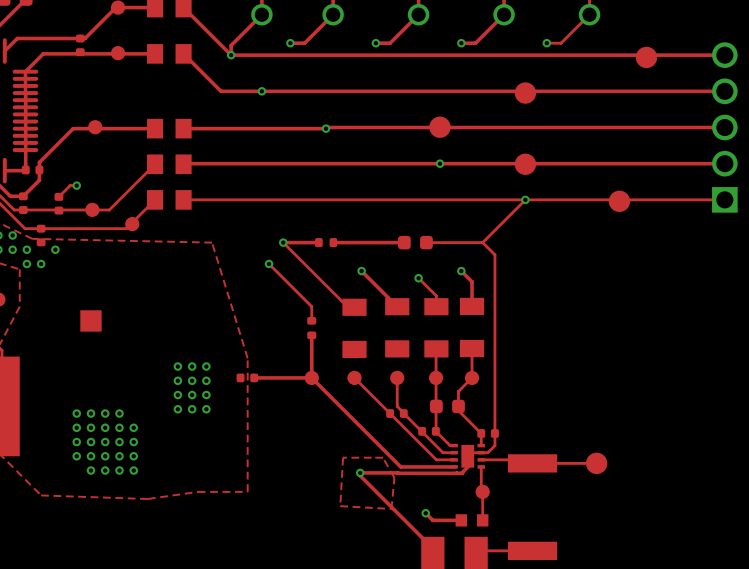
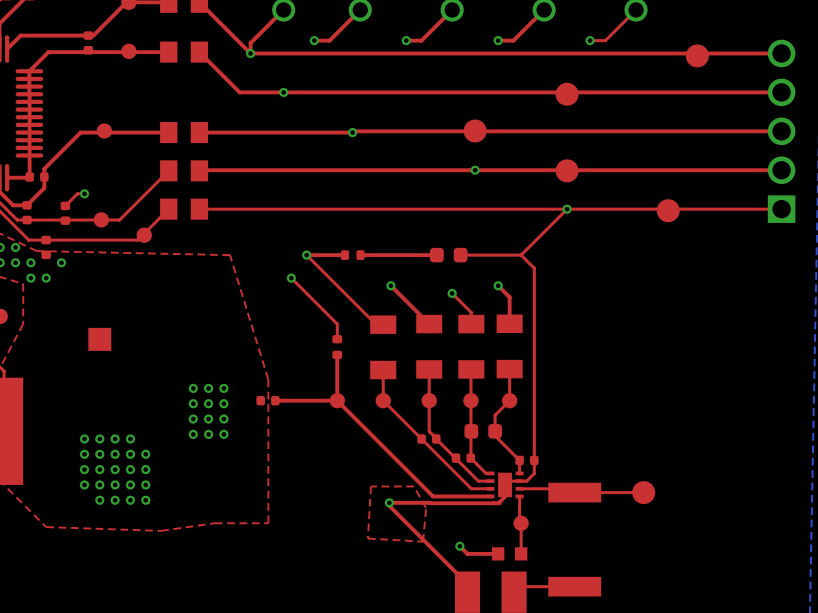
top track: none -> (429, 369) (429, 400)
top track: none -> (383, 370) (383, 400)

